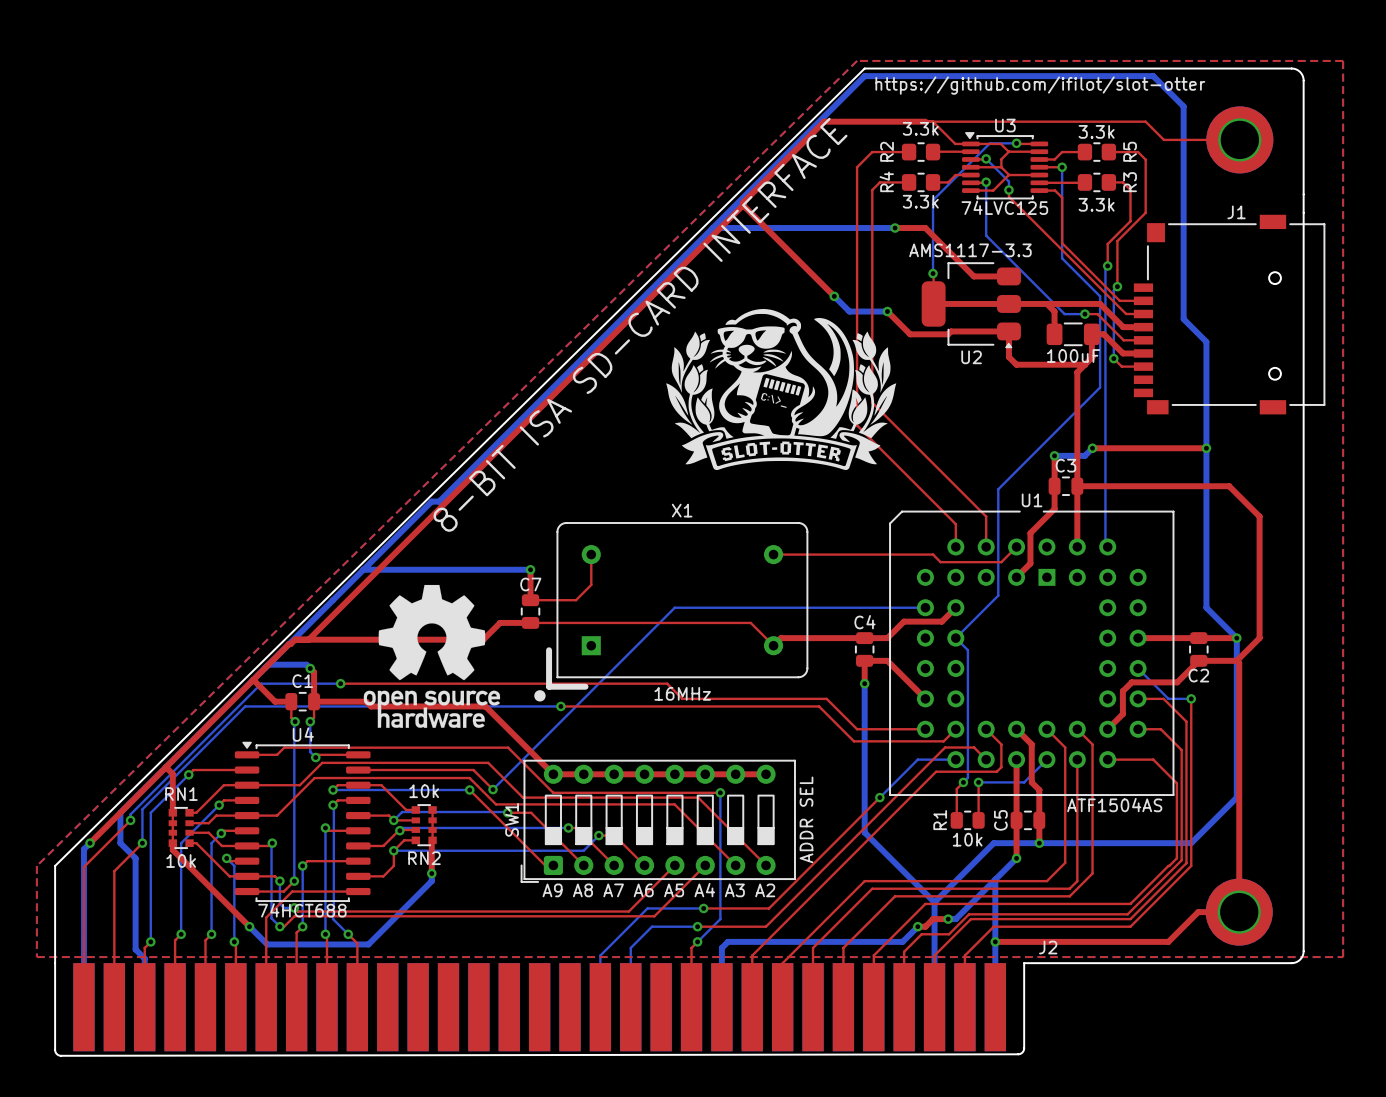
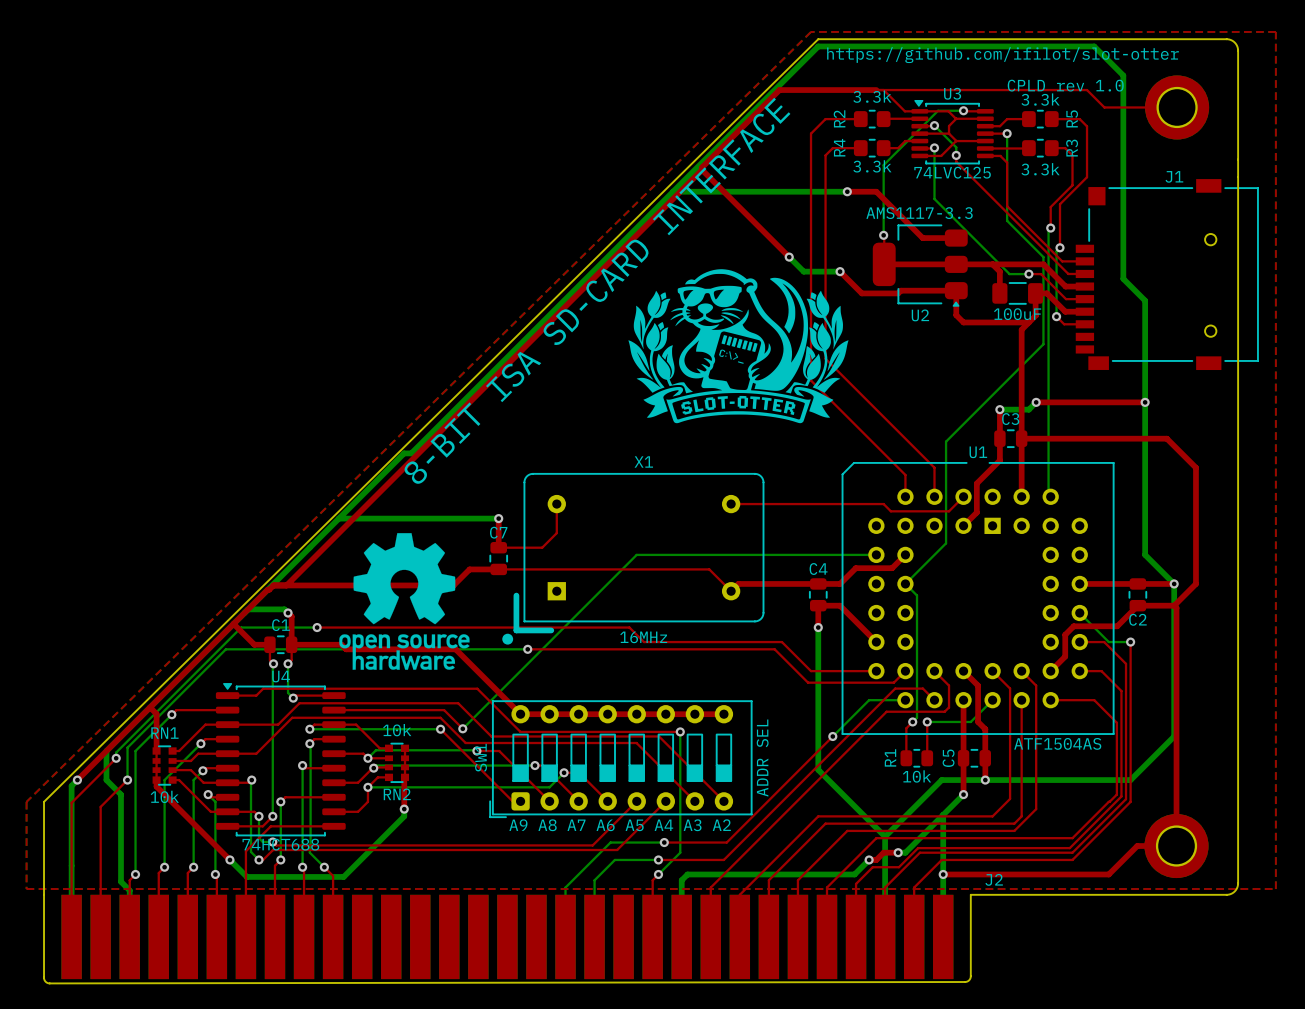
text: none -> CPLD rev 1.0 (1065, 85)

